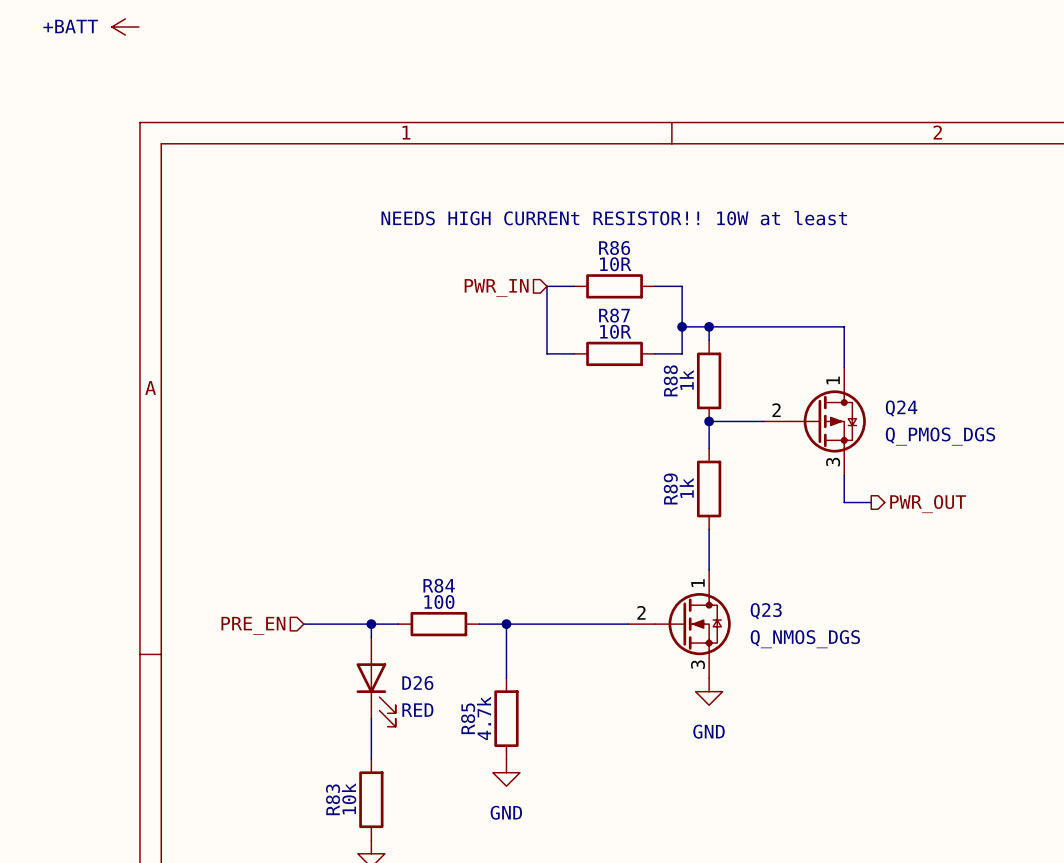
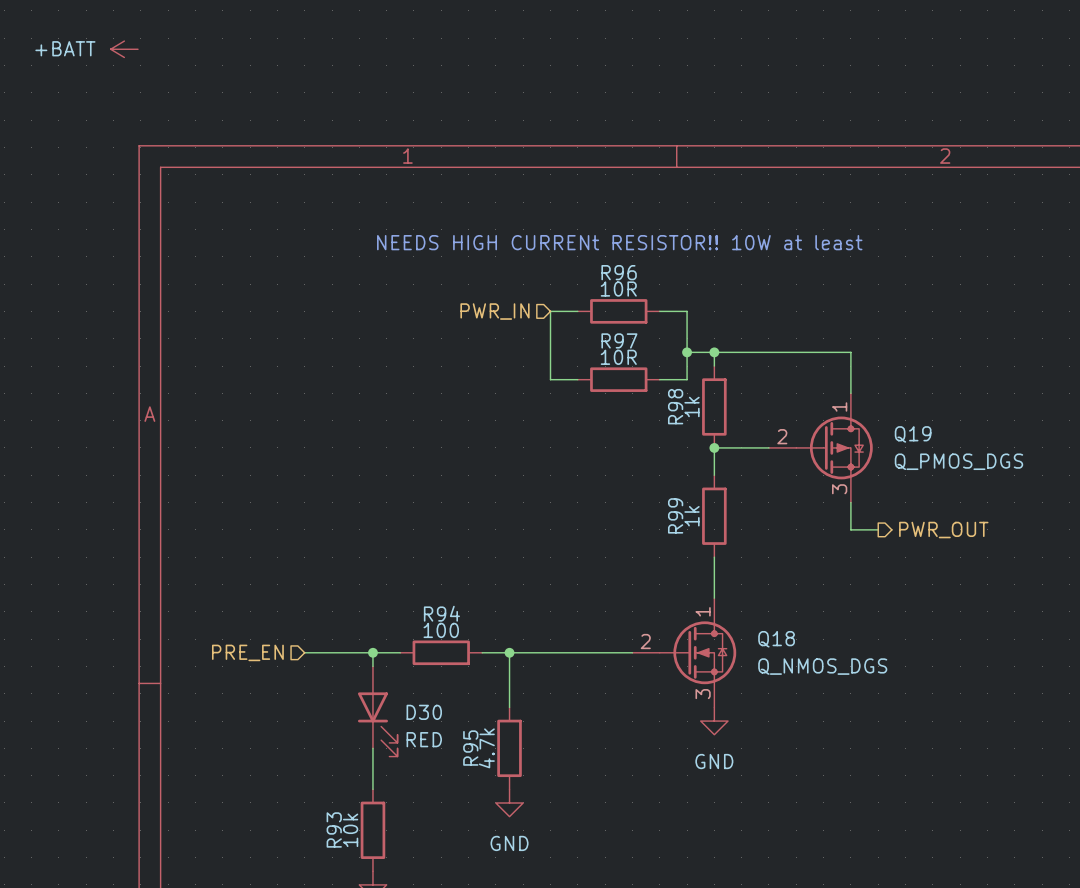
R86 name: R86 (614, 248) -> R96 (619, 272)
R87 name: R87 (614, 315) -> R97 (619, 340)
R88 name: R88 (670, 380) -> R98 (675, 406)
Q24 name: Q24 (901, 408) -> Q19 (913, 434)
R89 name: R89 (670, 488) -> R99 (675, 515)
R84 name: R84 (439, 585) -> R94 (441, 613)
Q23 name: Q23 (766, 611) -> Q18 (776, 639)
D26 name: D26 (417, 683) -> D30 (424, 712)
R85 name: R85 (468, 718) -> R95 (470, 748)
R83 name: R83 (333, 799) -> R93 (334, 829)

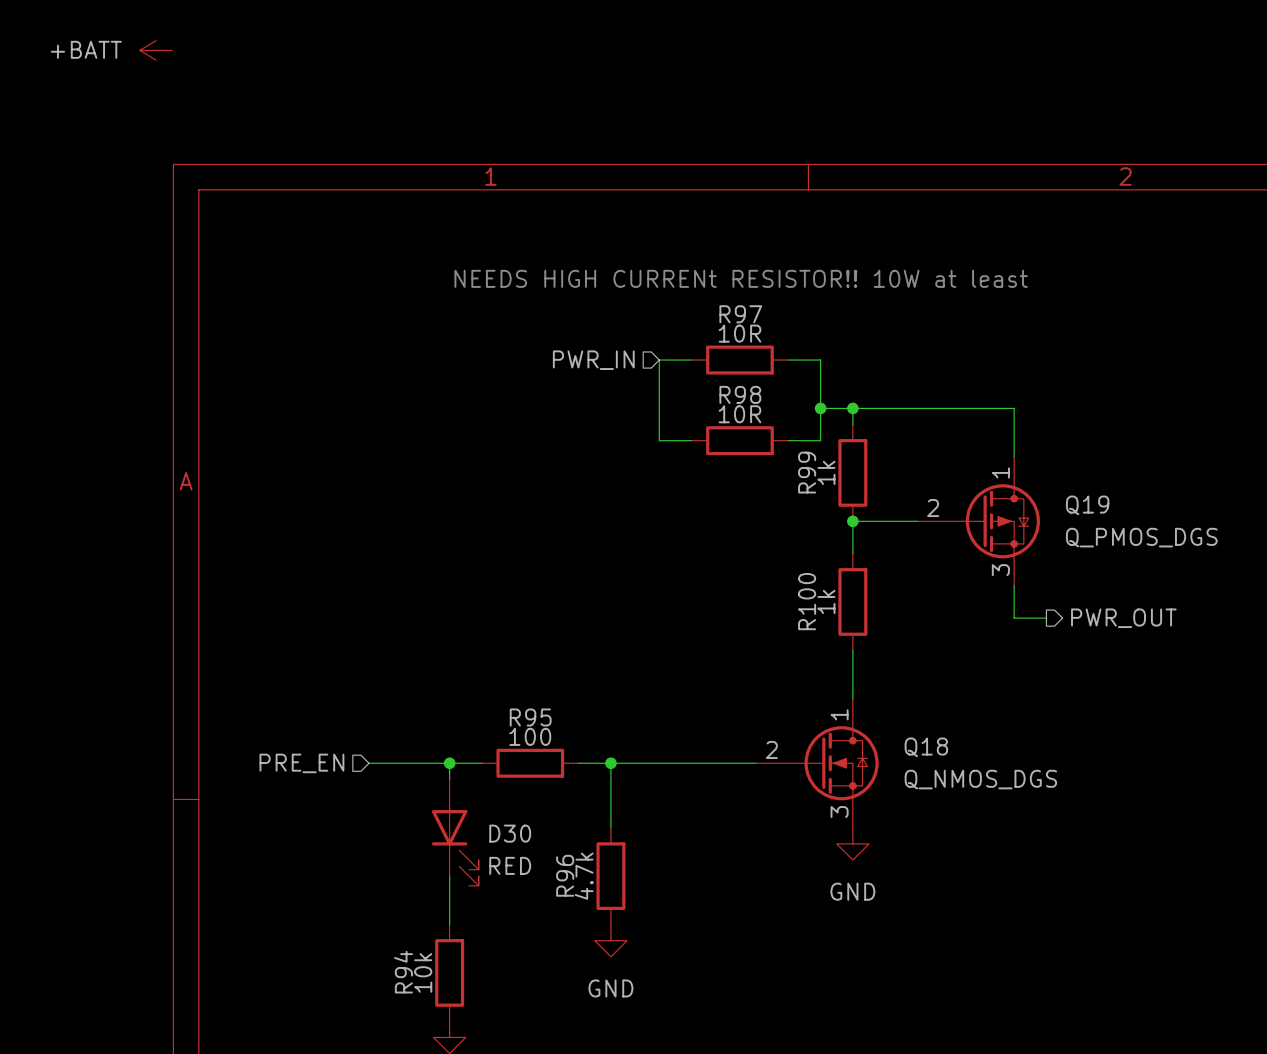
R96 name: R96 (619, 272) -> R97 (740, 314)
R97 name: R97 (619, 340) -> R98 (740, 394)
R98 name: R98 (675, 406) -> R99 (807, 472)
R99 name: R99 (675, 515) -> R100 (807, 601)
R94 name: R94 (441, 613) -> R95 (530, 717)
R95 name: R95 (470, 748) -> R96 (565, 875)
R93 name: R93 (334, 829) -> R94 (403, 972)

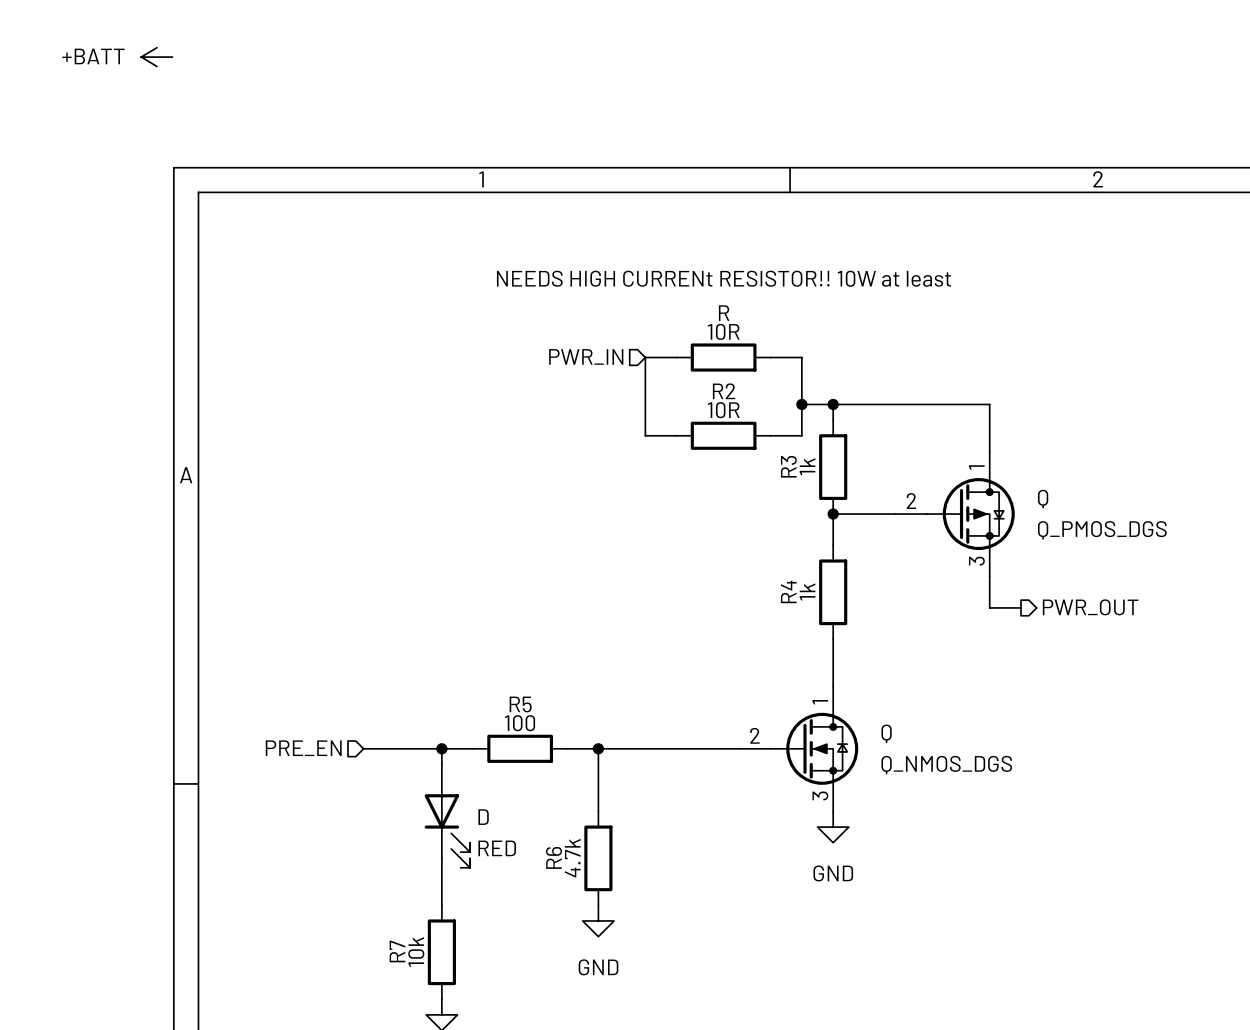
R97 name: R97 (740, 314) -> R (724, 313)
R98 name: R98 (740, 394) -> R2 (724, 391)
R99 name: R99 (807, 472) -> R3 (788, 466)
Q19 name: Q19 (1087, 505) -> Q (1043, 499)
R100 name: R100 (807, 601) -> R4 (788, 591)
R95 name: R95 (530, 717) -> R5 (520, 704)
Q18 name: Q18 (926, 747) -> Q (886, 733)
D30 name: D30 (510, 833) -> D (483, 817)
R96 name: R96 (565, 875) -> R6 (553, 857)
R94 name: R94 (403, 972) -> R7 (397, 951)

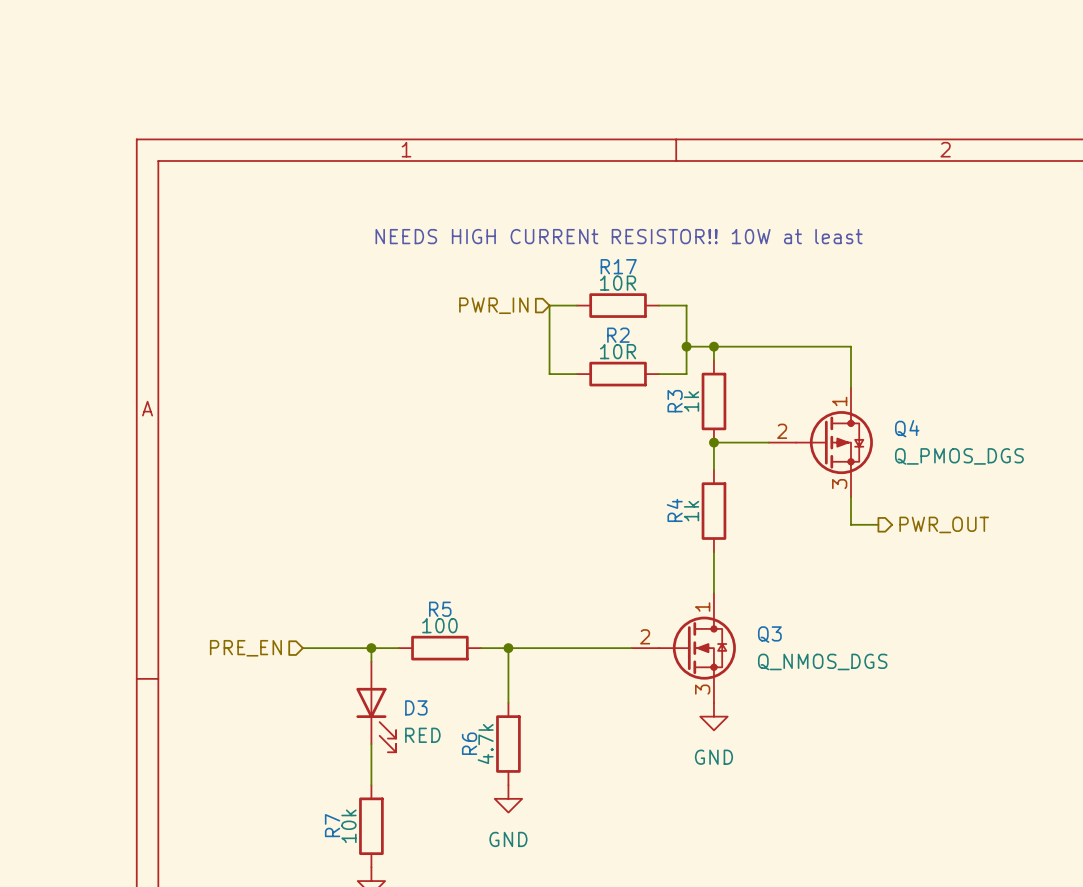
power symbol: +BATT (156, 57) -> none
R name: R (724, 313) -> R17 (618, 266)
Q name: Q (1043, 499) -> Q4 (907, 428)
Q name: Q (886, 733) -> Q3 (769, 634)
D name: D (483, 817) -> D3 (416, 707)

